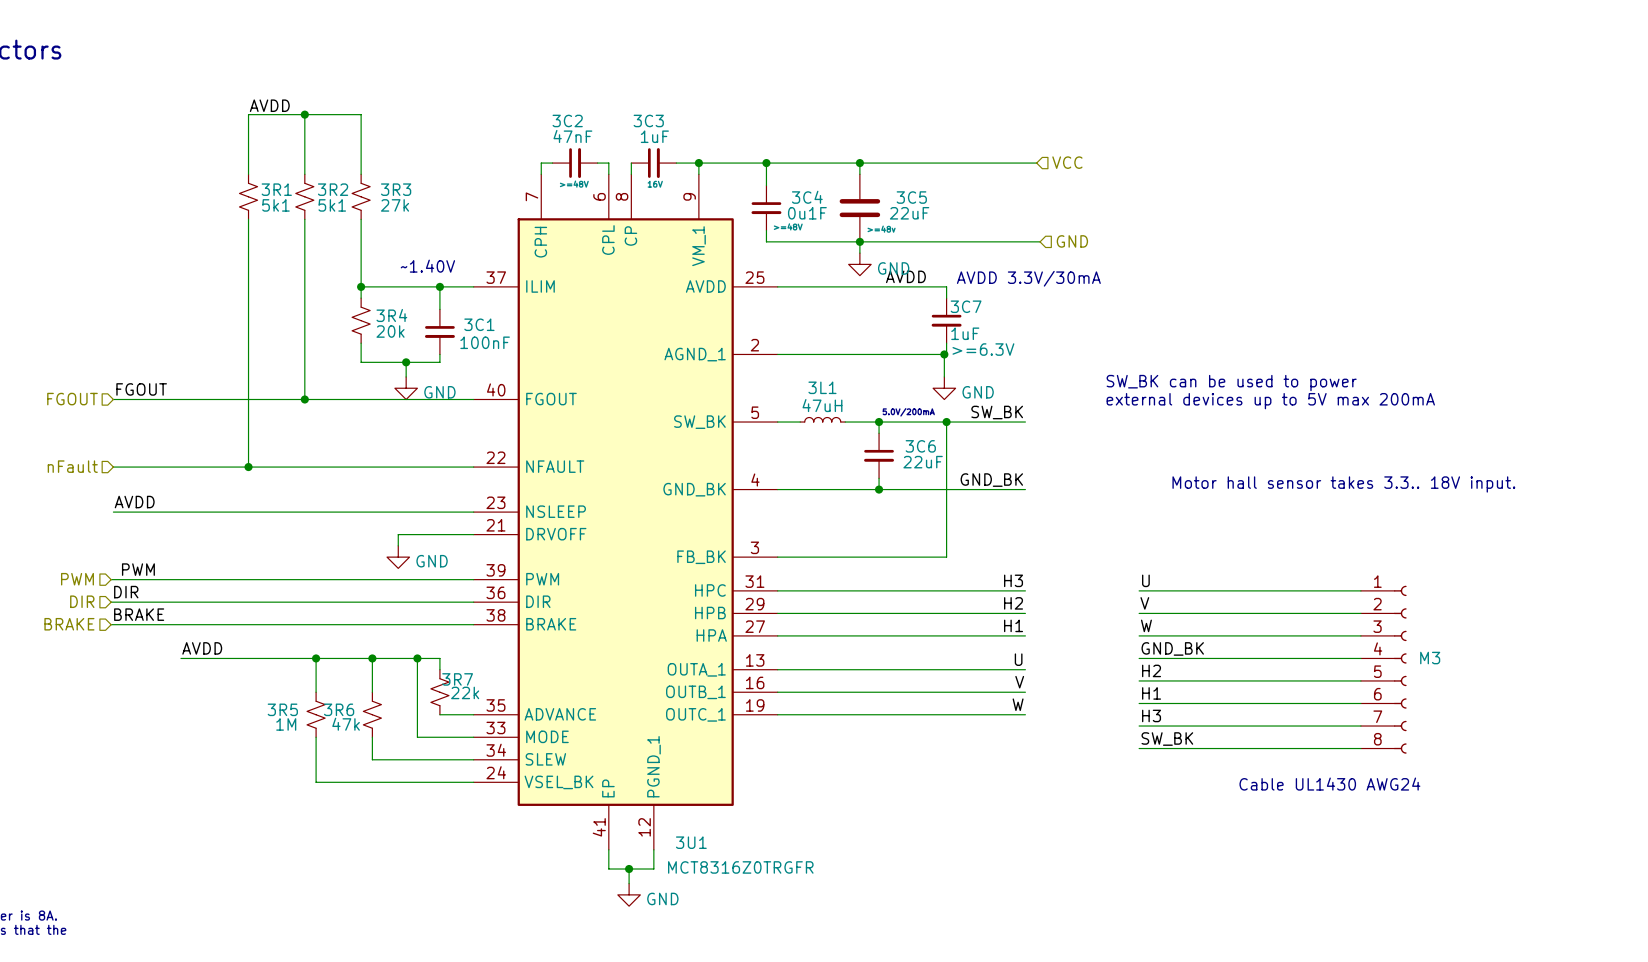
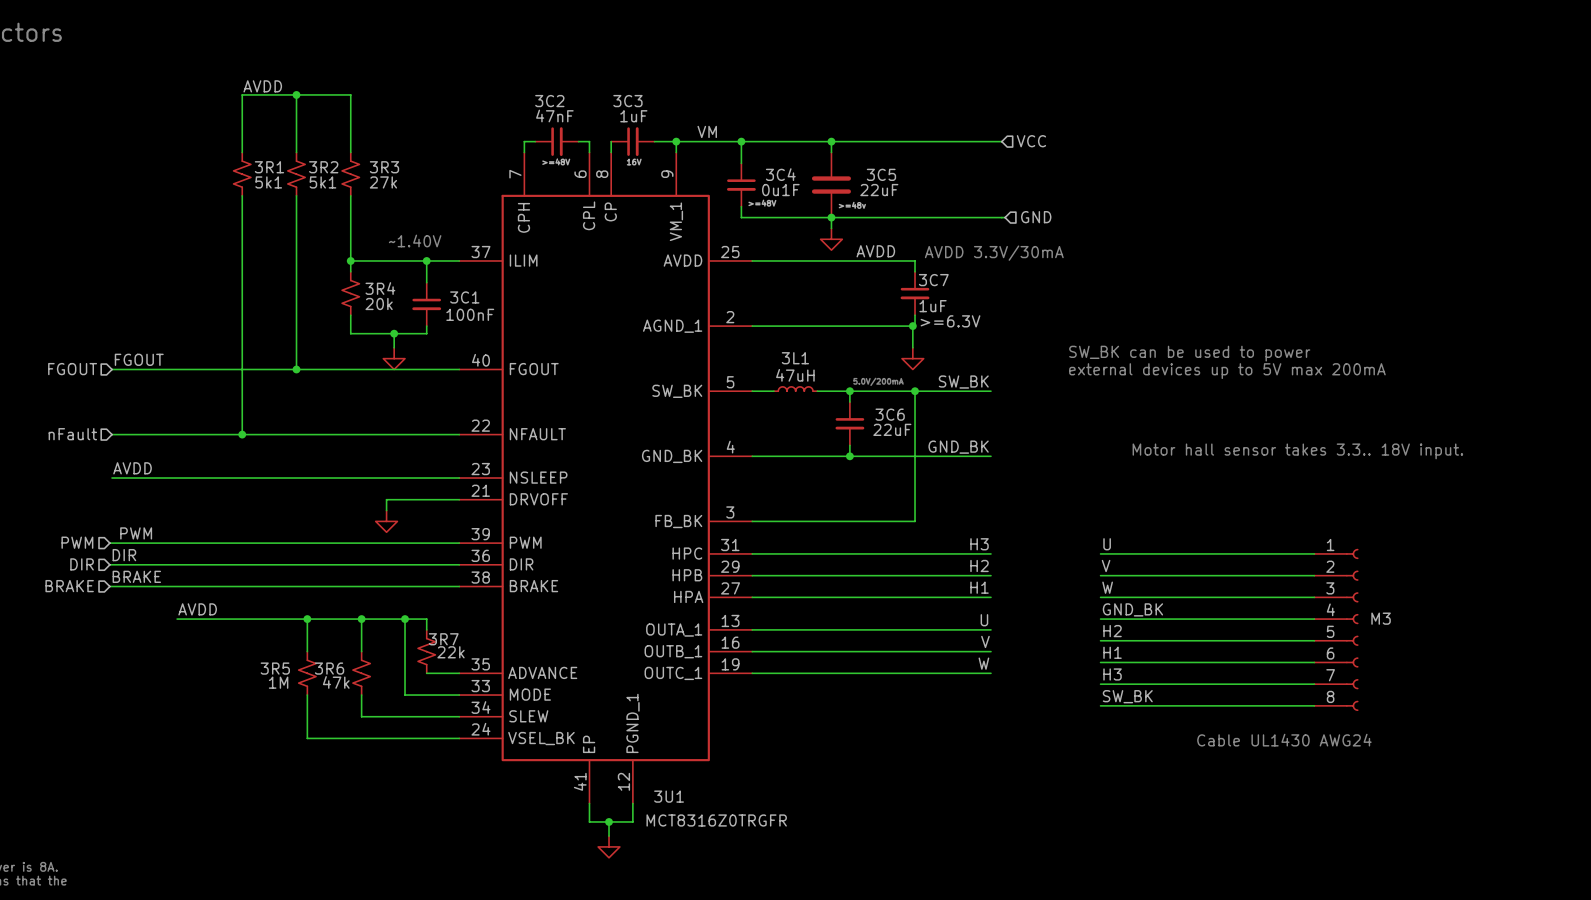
label: none -> VM (707, 131)
power symbol text: GND (893, 268) -> none
power symbol text: GND (439, 392) -> none
power symbol text: GND (978, 392) -> none
power symbol text: GND (432, 561) -> none
power symbol text: GND (662, 898) -> none

